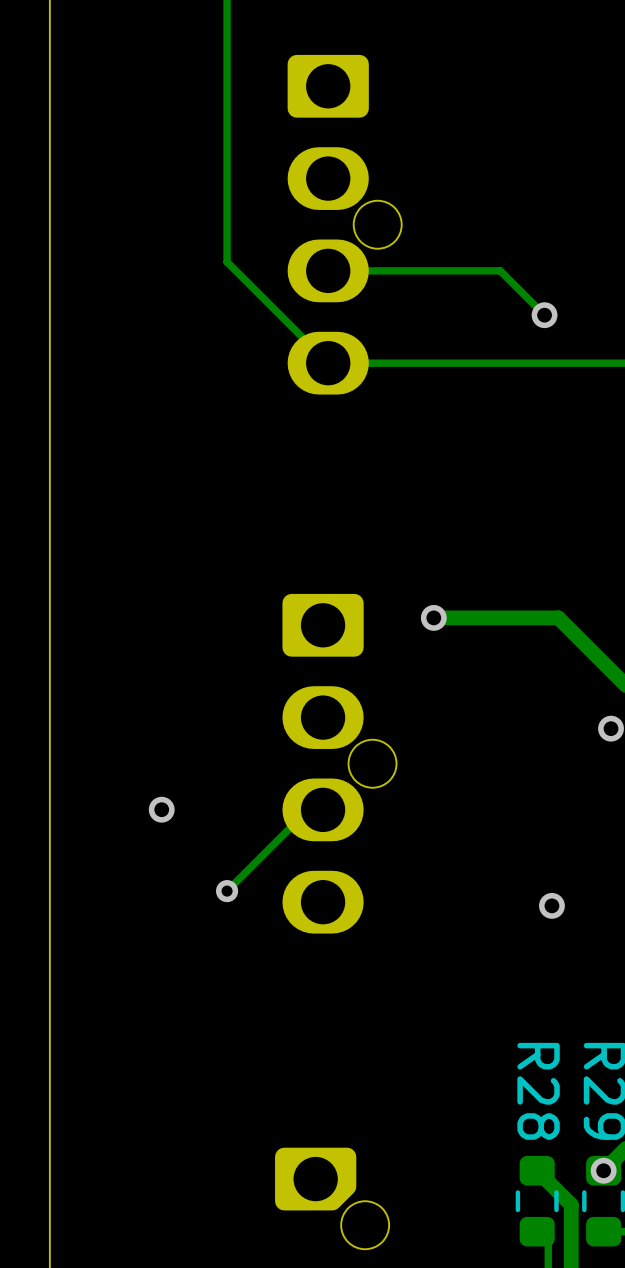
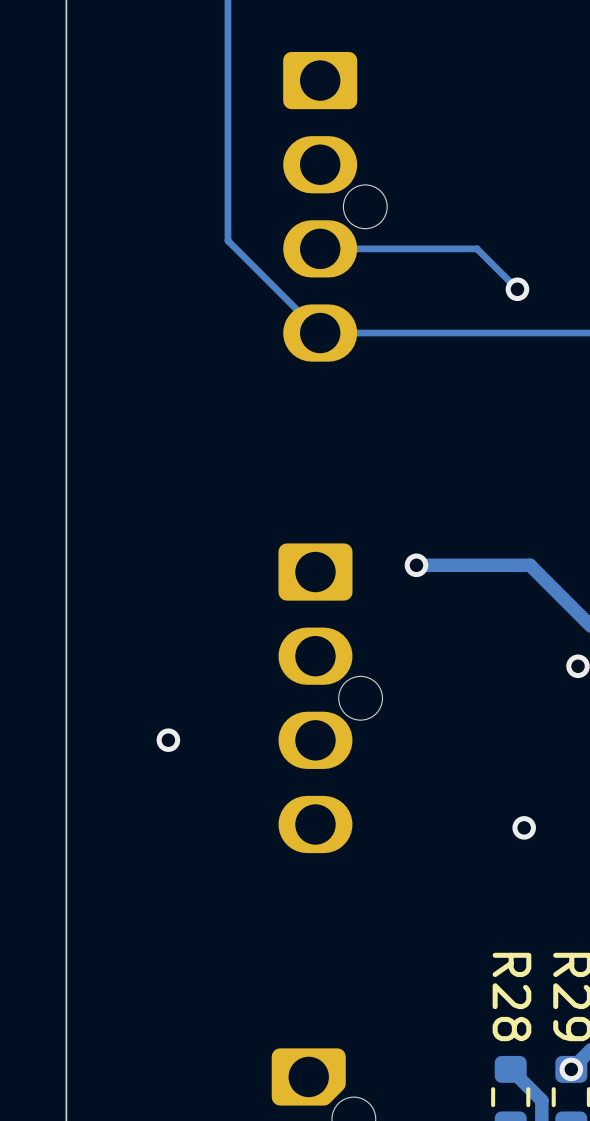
track: (323, 809) (308, 809) (227, 891) -> none
via: (227, 891) -> none

